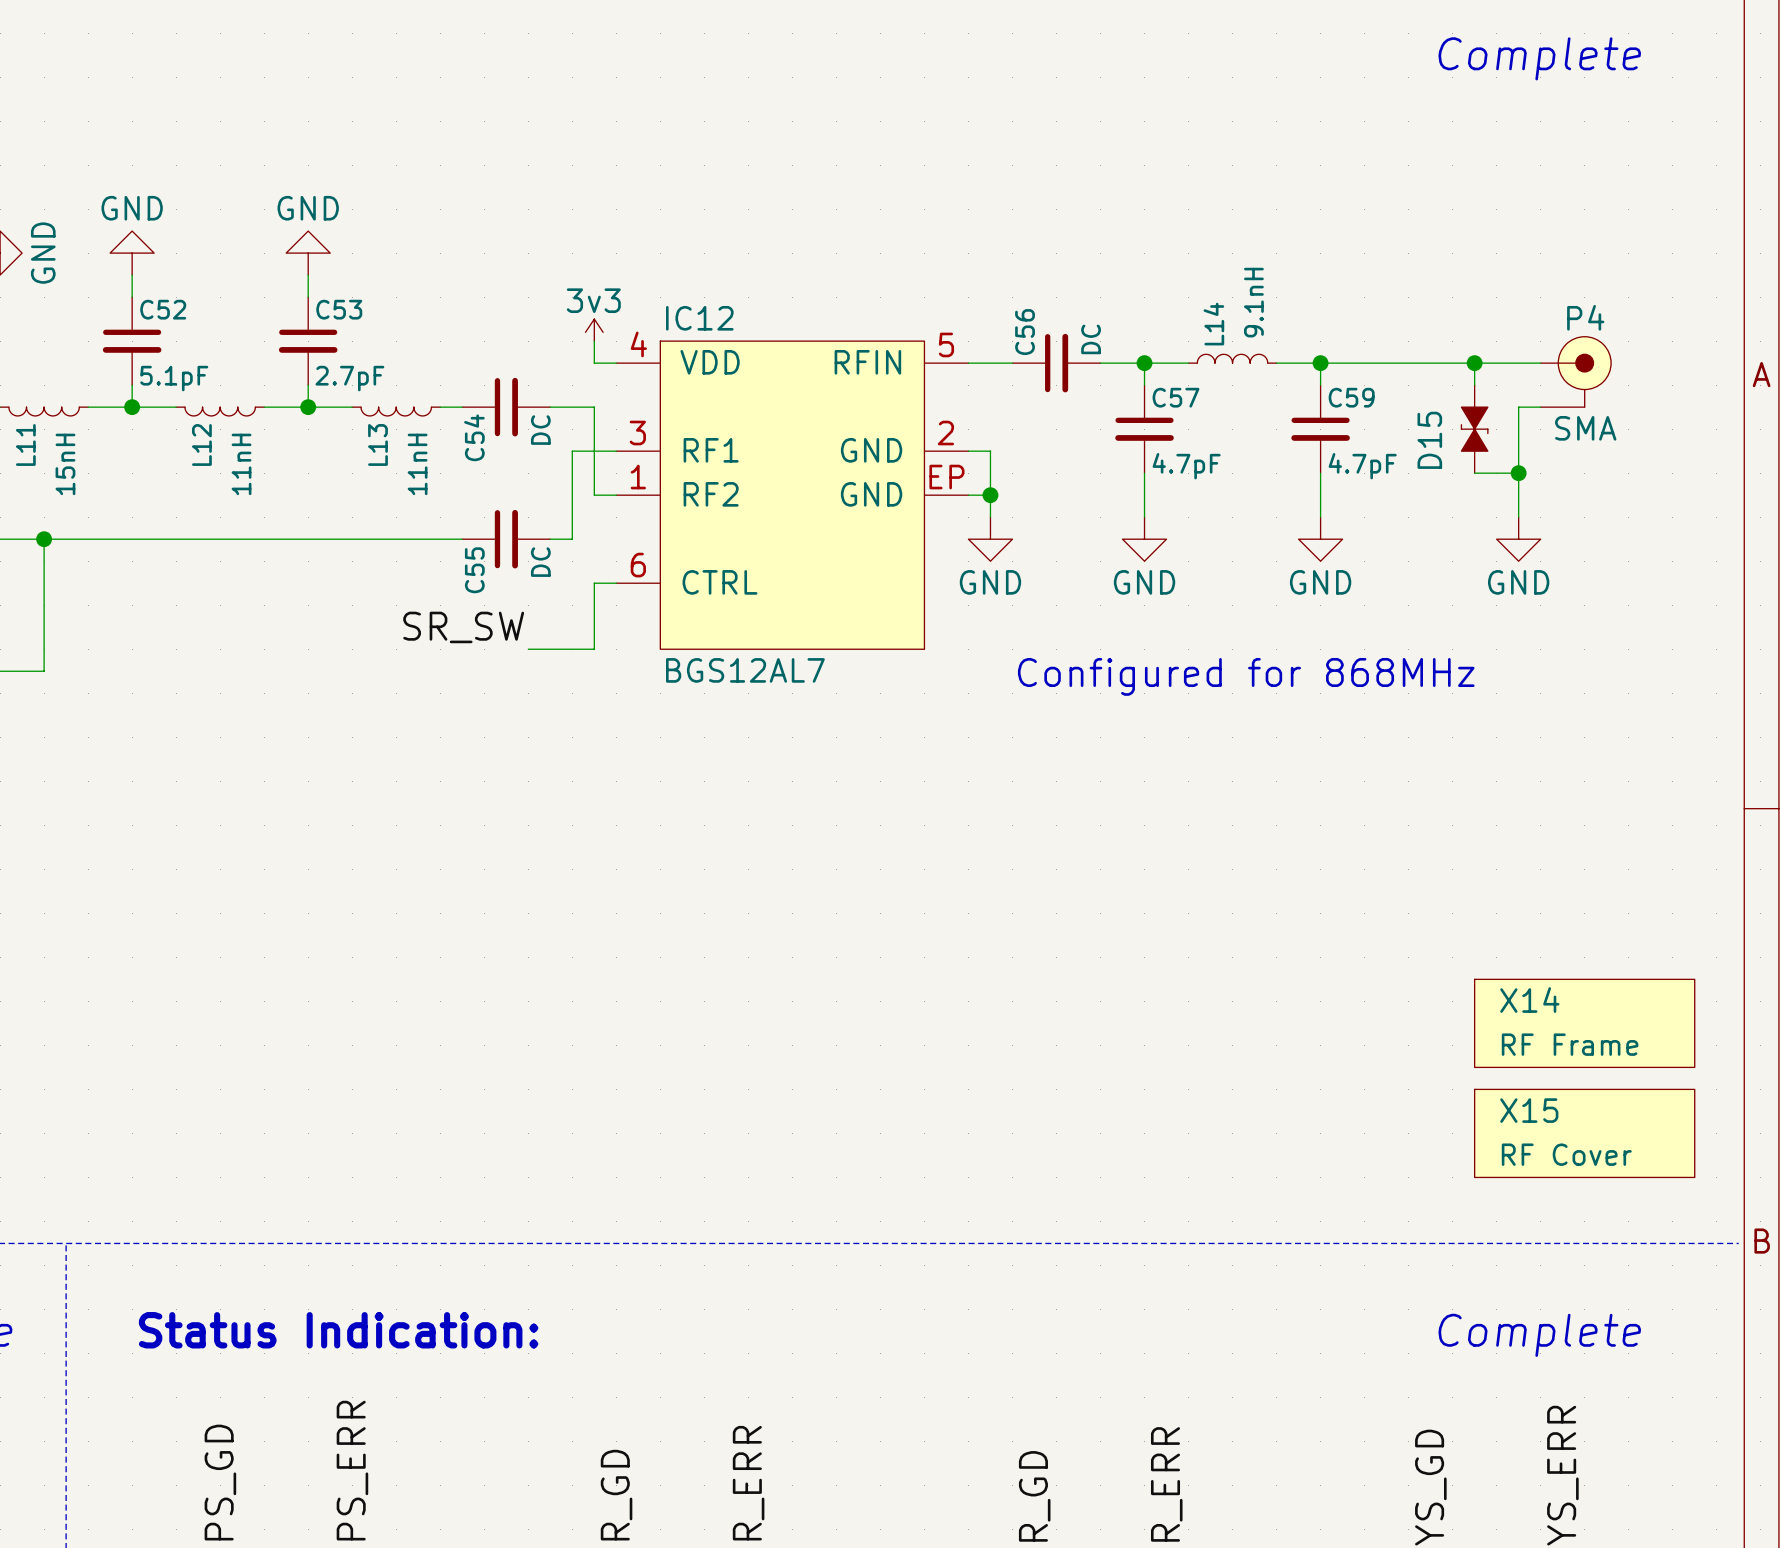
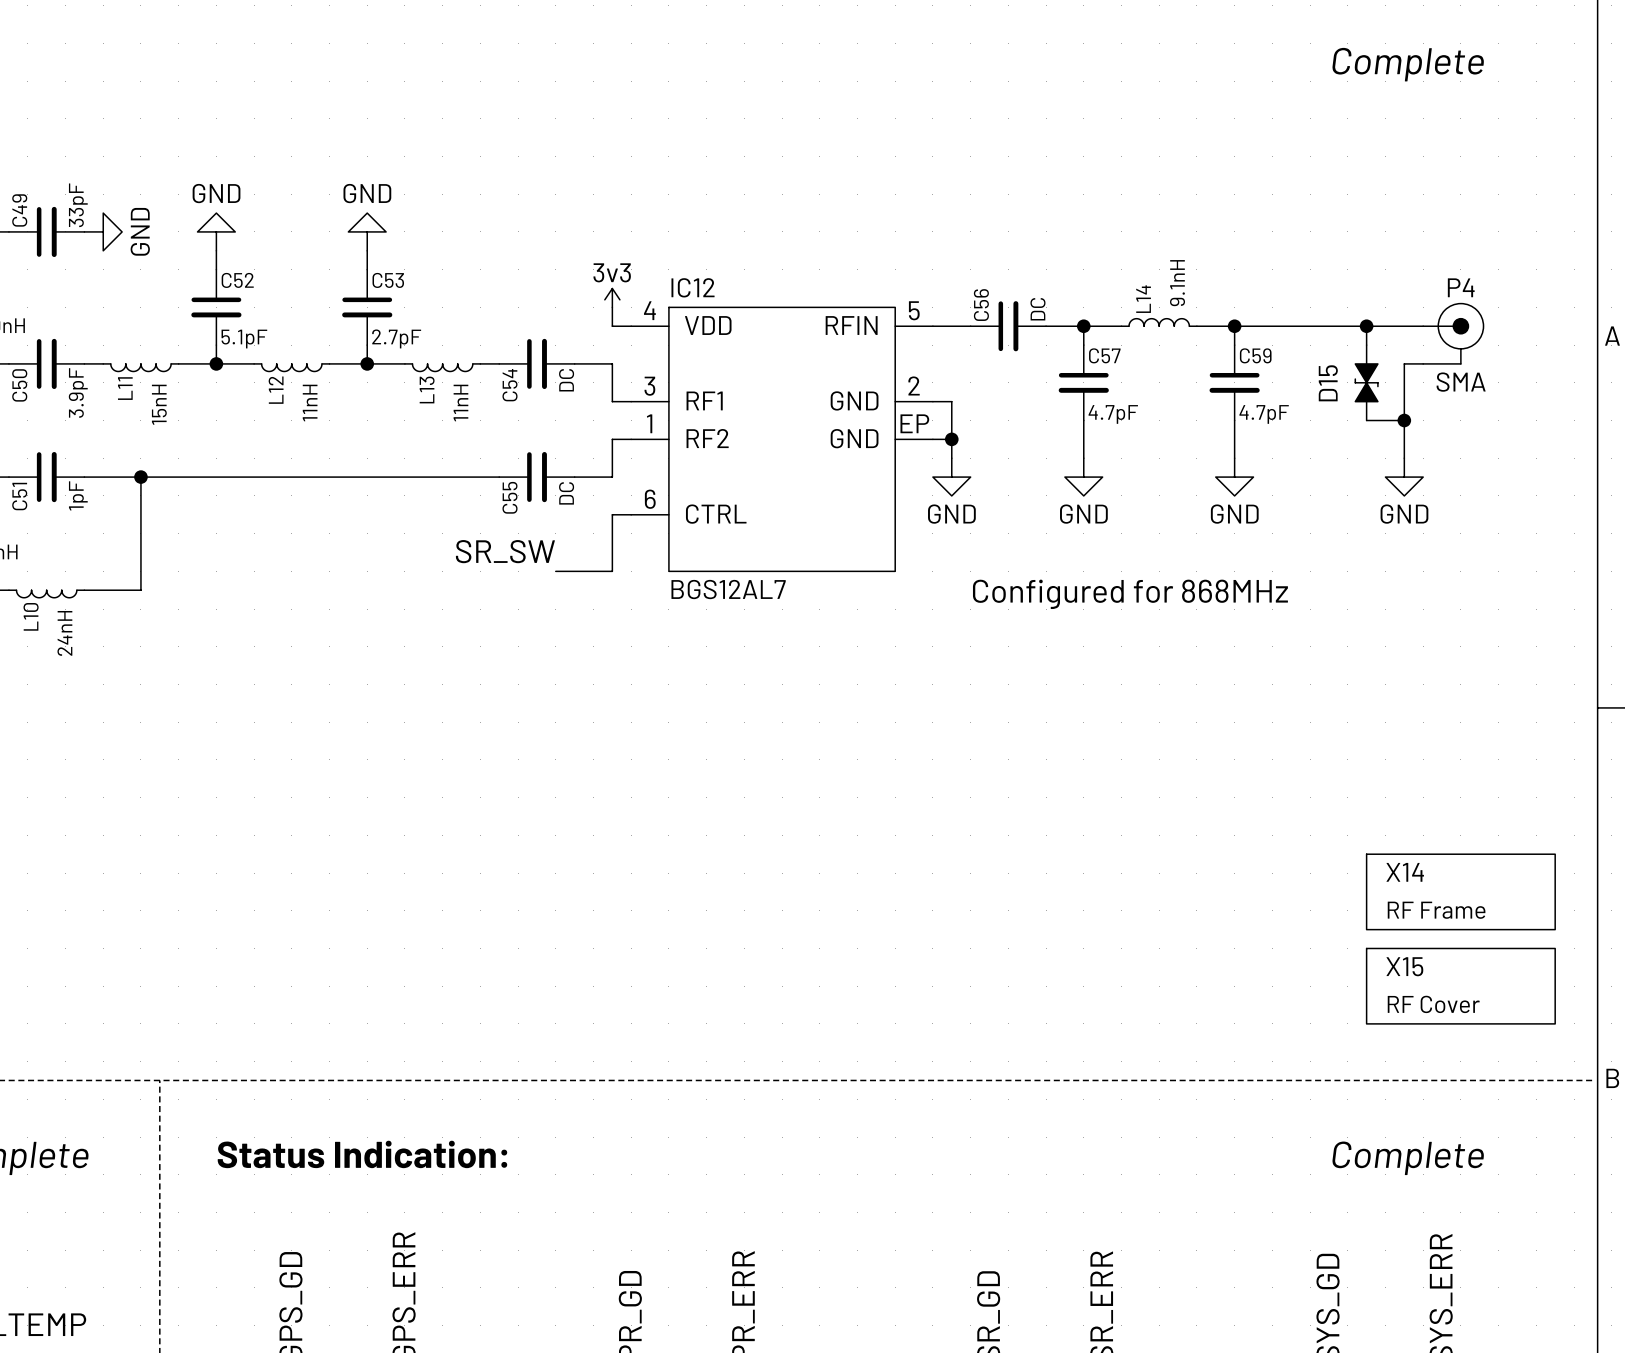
wire: (594, 495) (594, 451) (572, 451) (572, 539) -> (612, 439) (612, 477) (593, 477)

